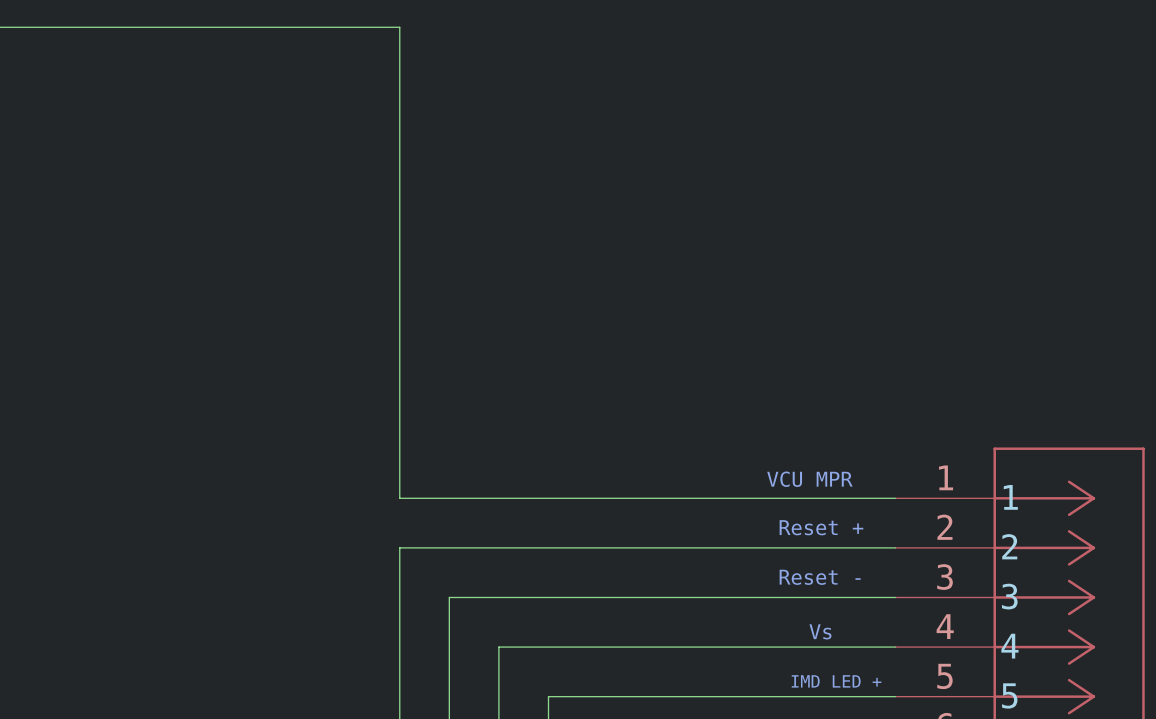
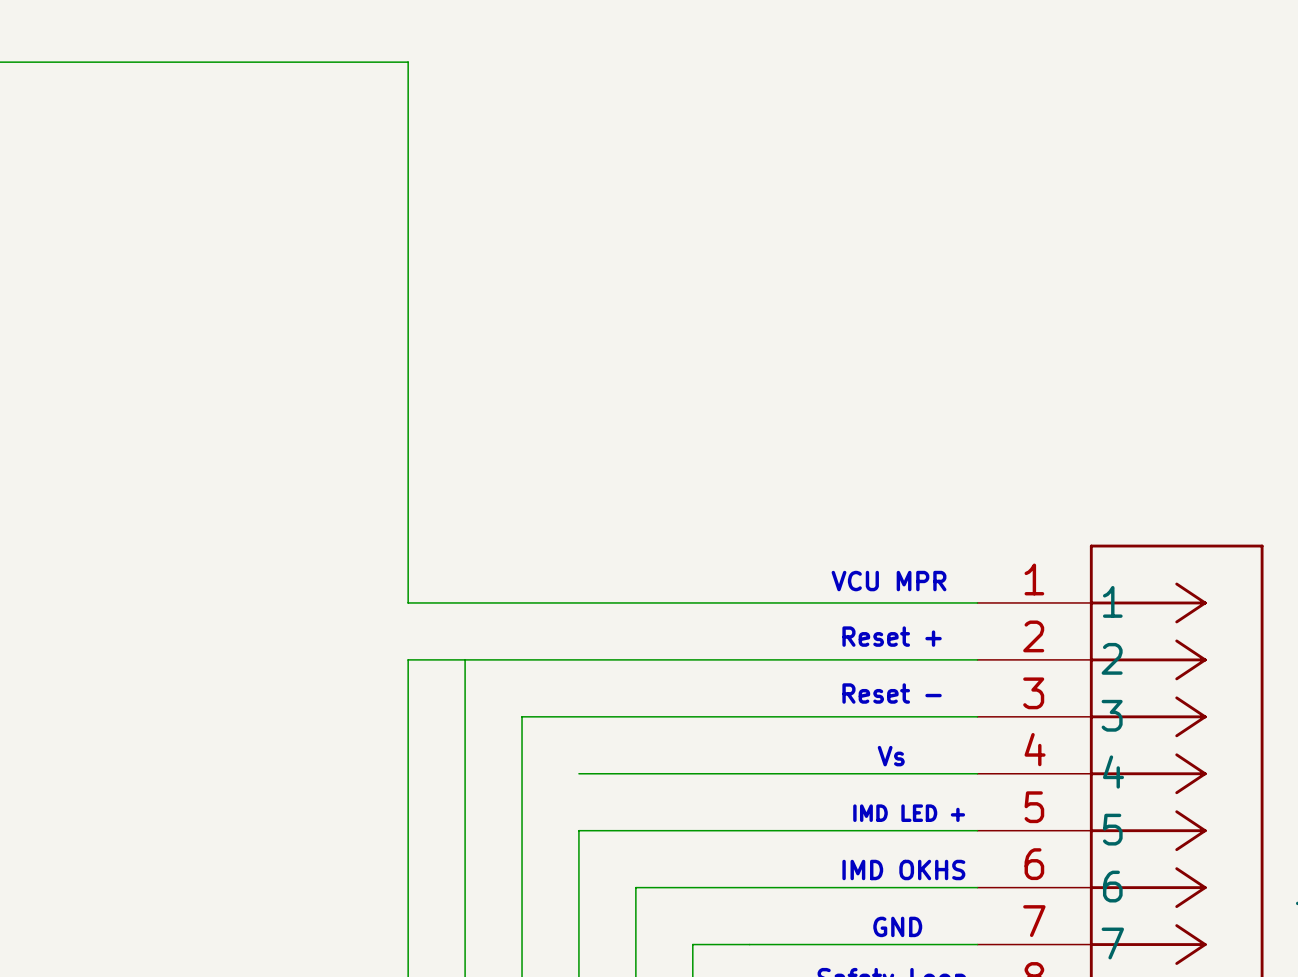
wire: (449, 597) (498, 597) -> (465, 716) (465, 659)
wire: (498, 647) (548, 647) -> (522, 773) (522, 716)

